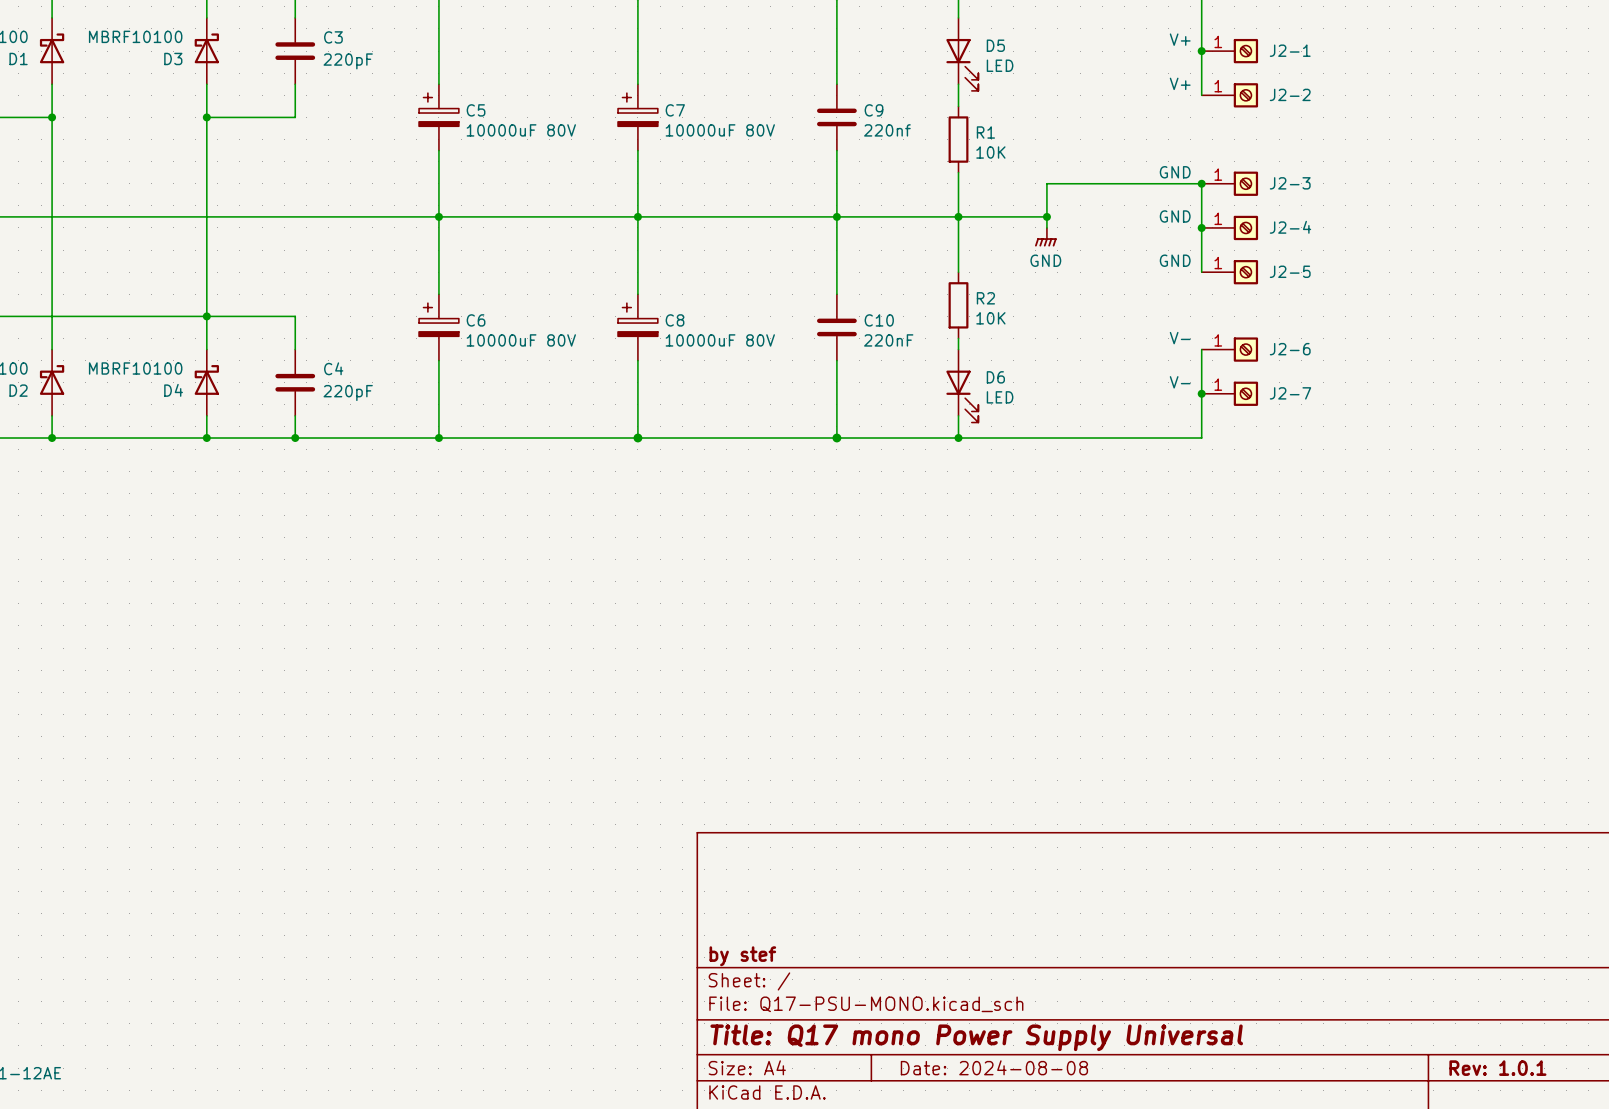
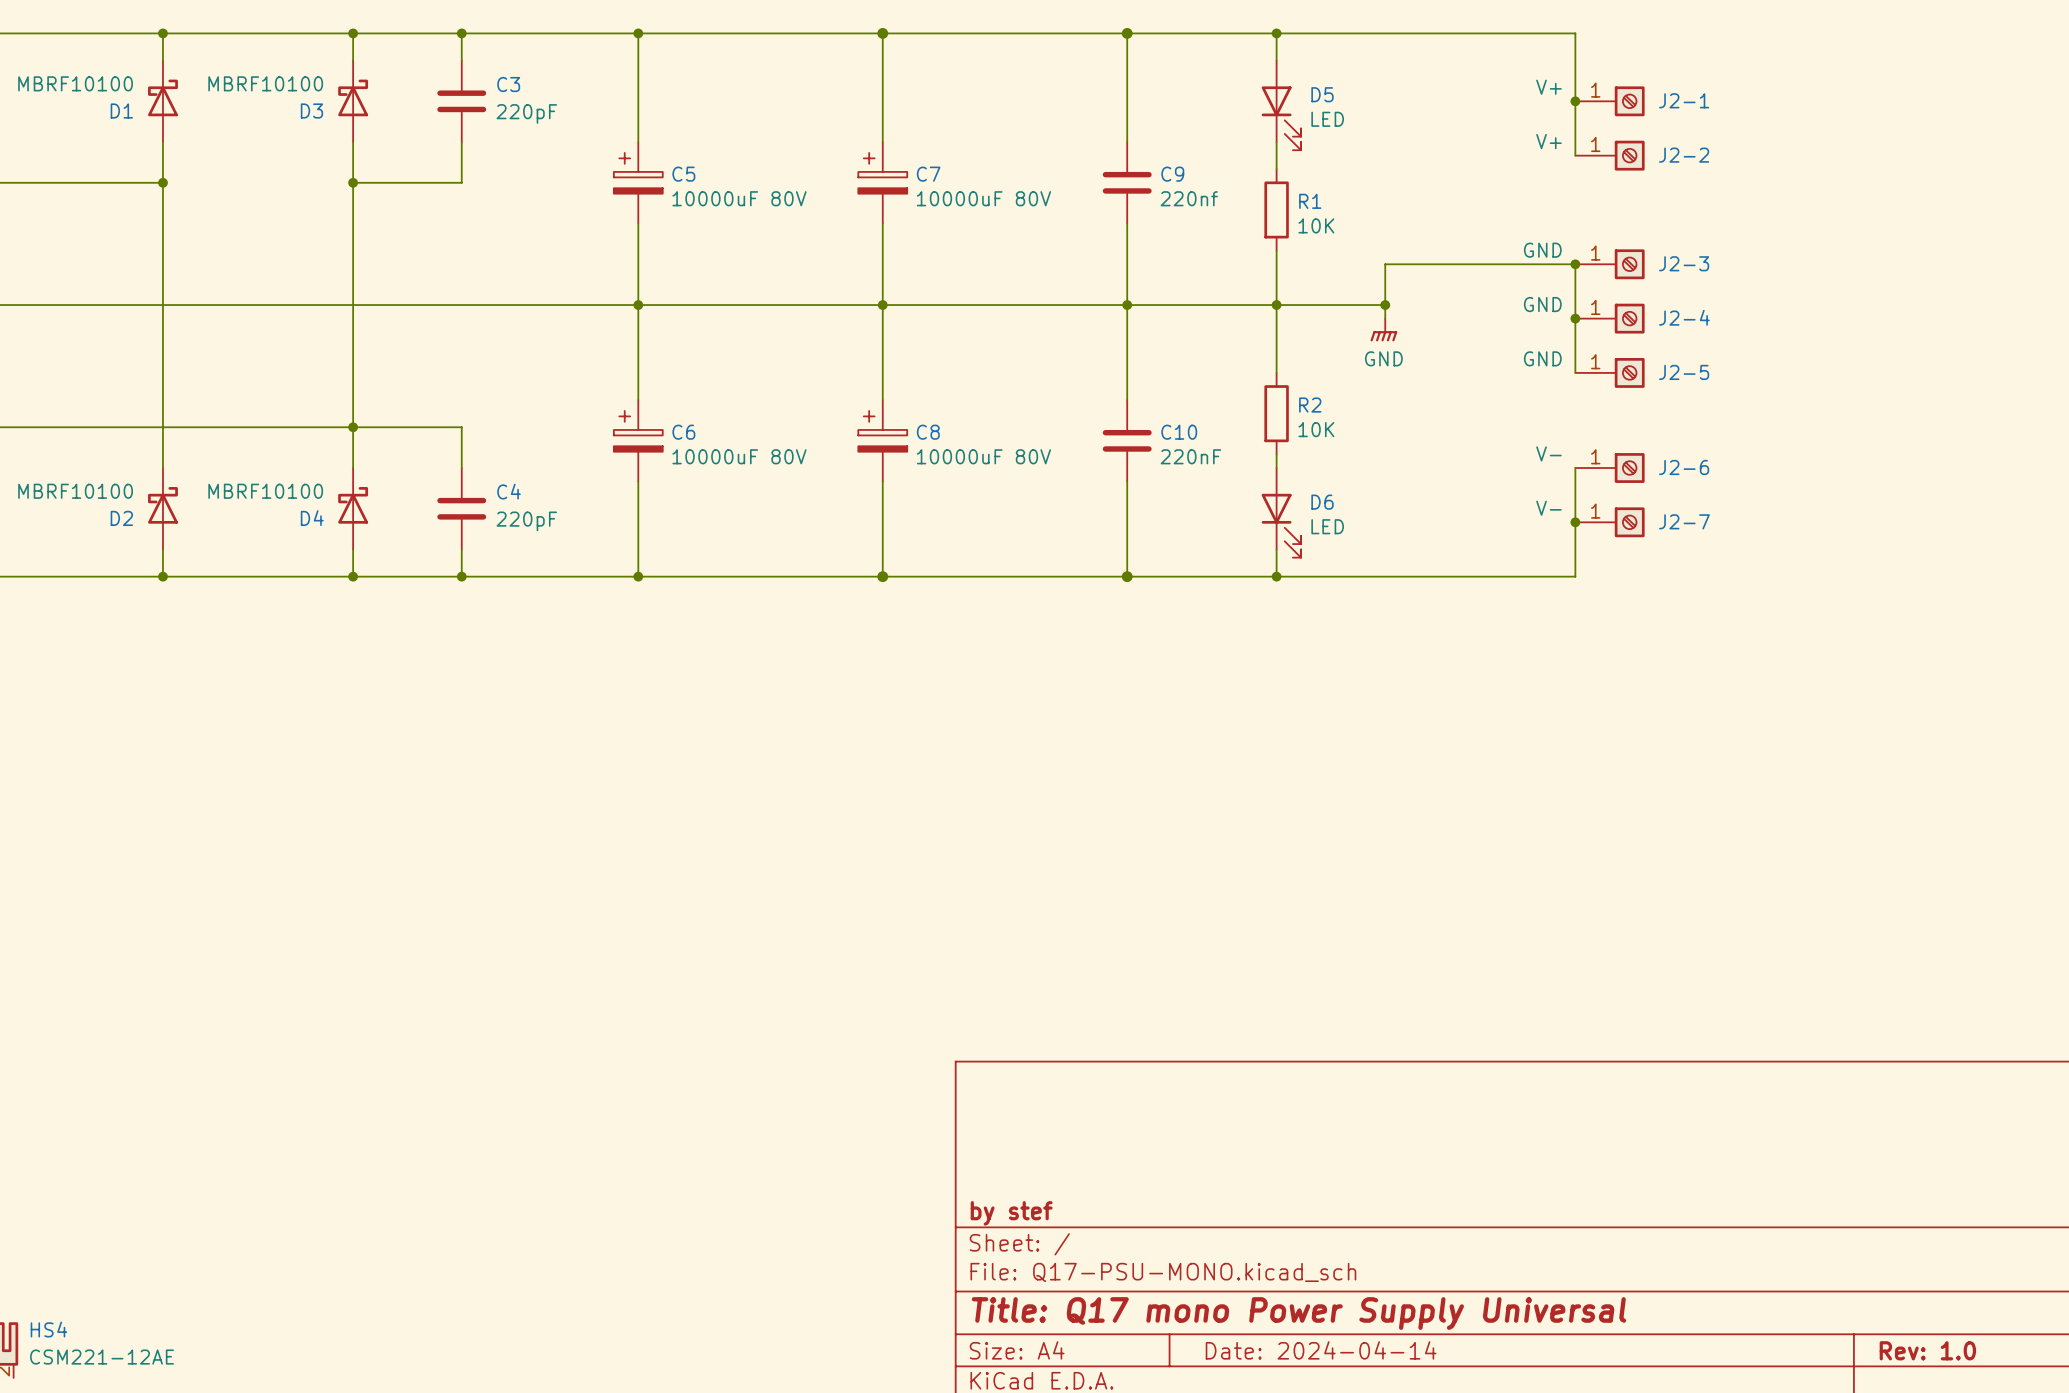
title block: Date: 2024-08-08 (994, 1067) -> Date: 2024-04-14 (1321, 1350)
title block: Rev: 1.0.1 (1497, 1068) -> Rev: 1.0 (1927, 1350)

